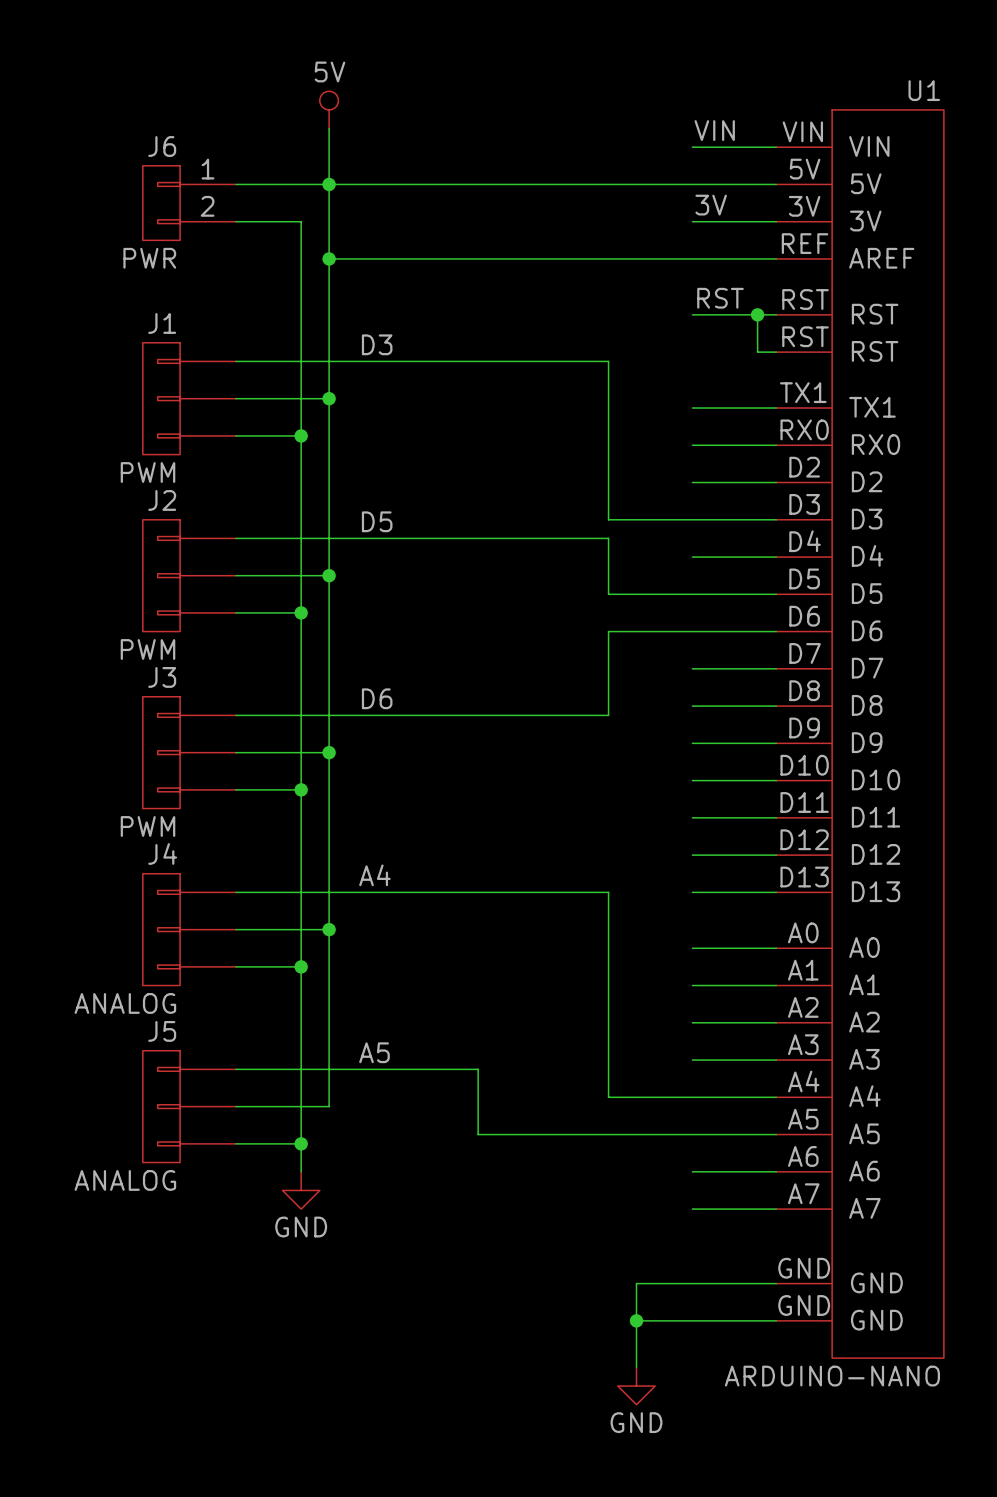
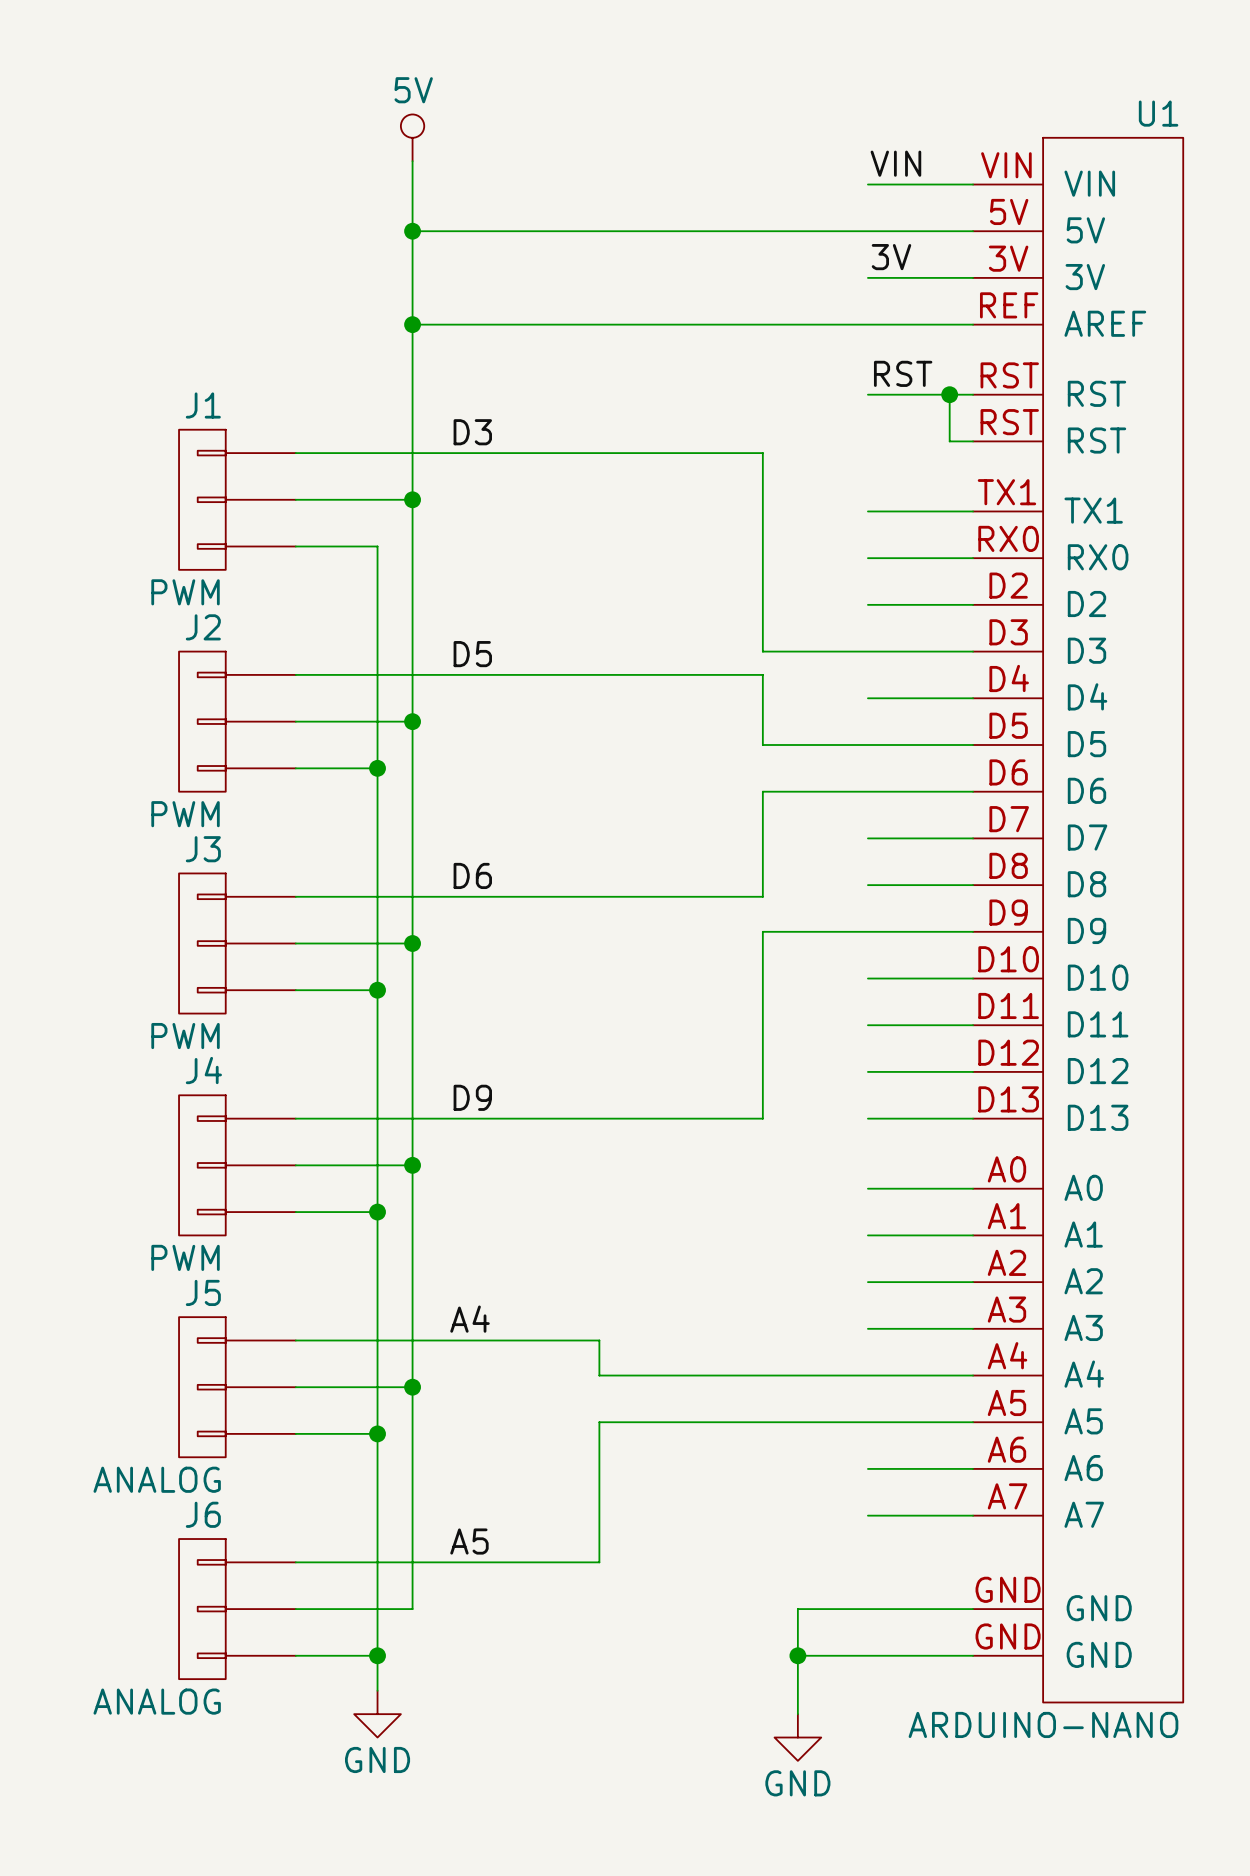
J6 symbol: [142, 165, 236, 241] -> [179, 1539, 296, 1680]
wire: (235, 184) (329, 184) -> none
wire: (235, 221) (301, 221) (301, 435) -> none
J6 value: PWR (149, 258) -> ANALOG (157, 1701)
junction: (301, 435) -> none
label: A4 (374, 875) -> D9 (472, 1097)
wire: (608, 892) (608, 1097) -> (762, 1118) (762, 931) (867, 931)
J4 value: ANALOG (125, 1003) -> PWM (185, 1257)
label: A5 (374, 1052) -> A4 (470, 1319)
wire: (478, 1097) (478, 1134) -> (599, 1375) (762, 1375)
wire: none -> (412, 1387) (412, 1609) (295, 1609)
junction: none -> (412, 1387)
wire: none -> (599, 1422) (599, 1562) (295, 1562)
wire: none -> (377, 1468) (377, 1690)
power symbol position: GND (301, 1190) -> GND (377, 1714)
label: none -> A5 (469, 1541)
wire: none -> (295, 1655) (377, 1655)
junction: none -> (377, 1655)

